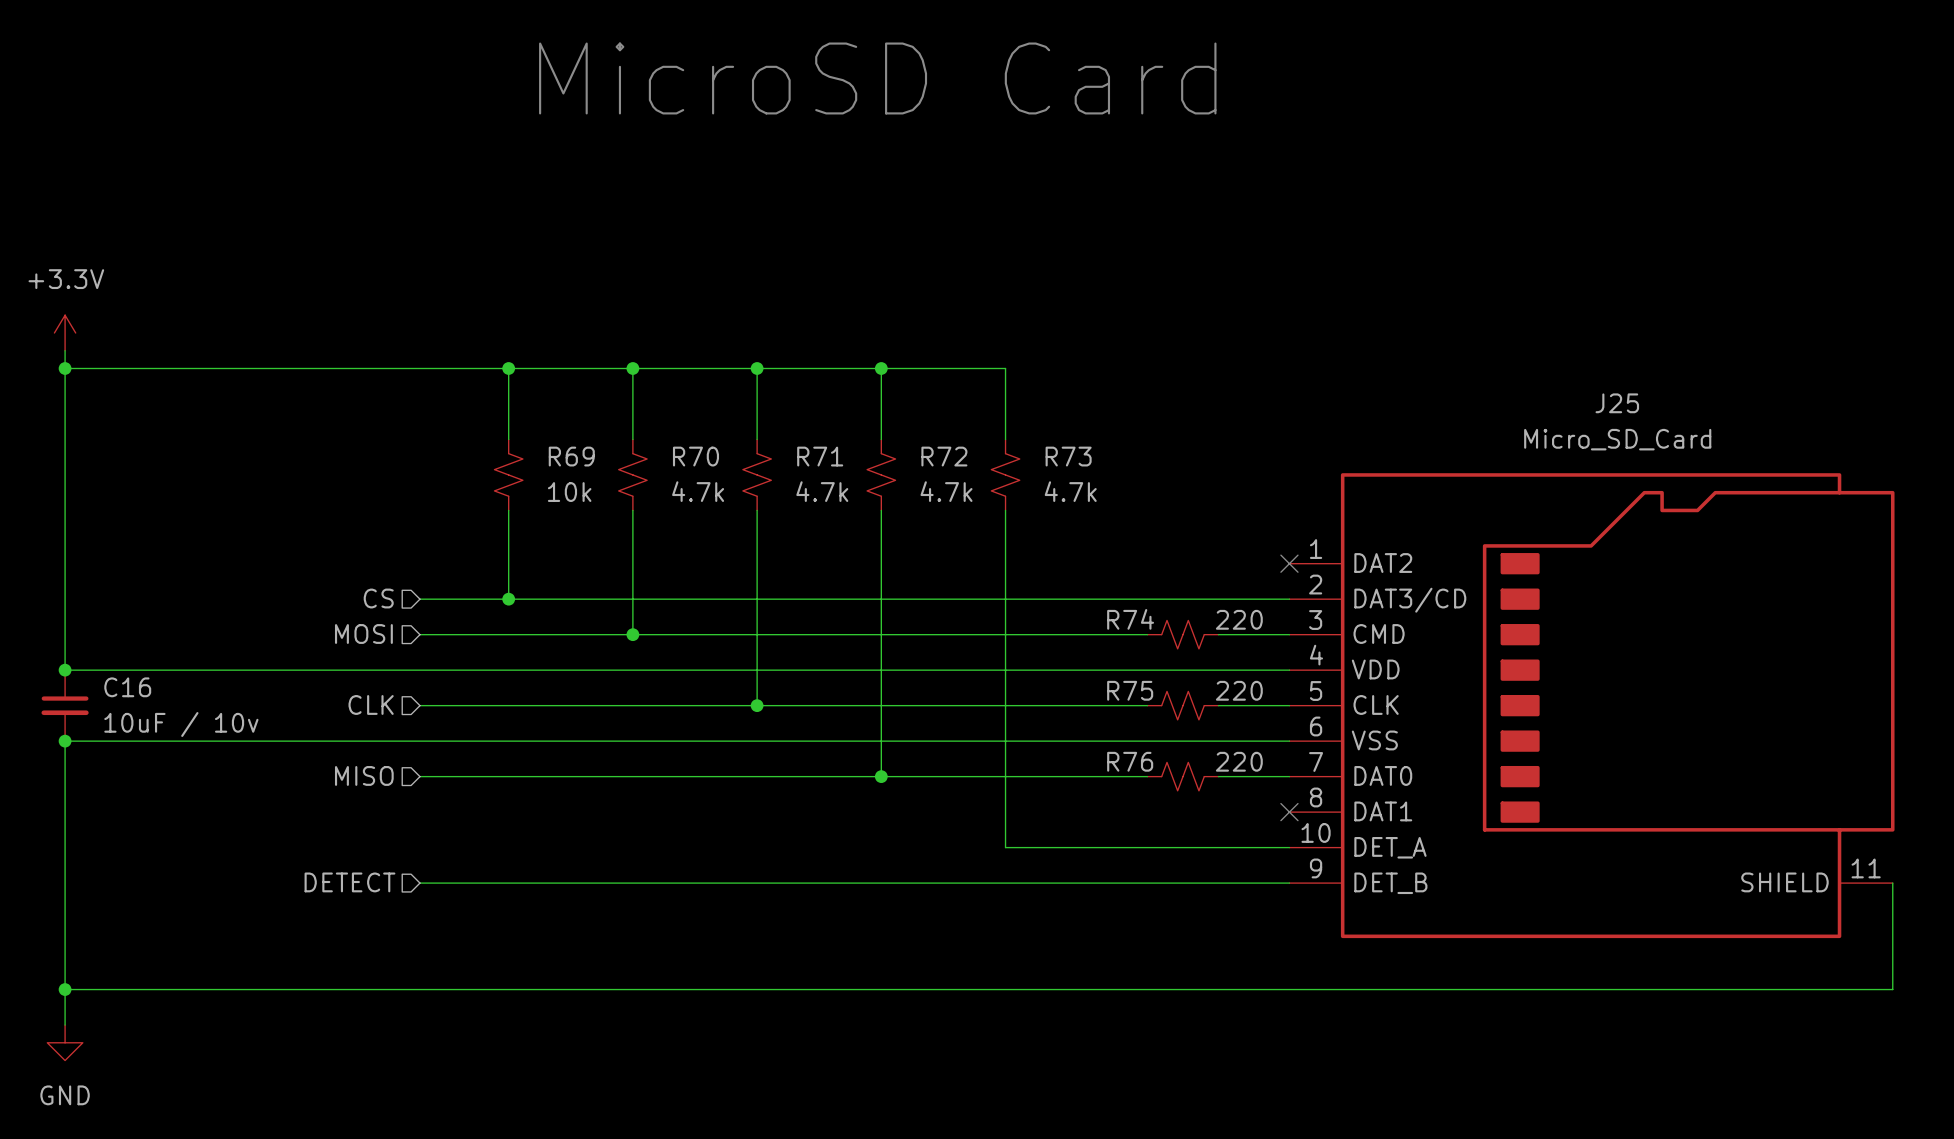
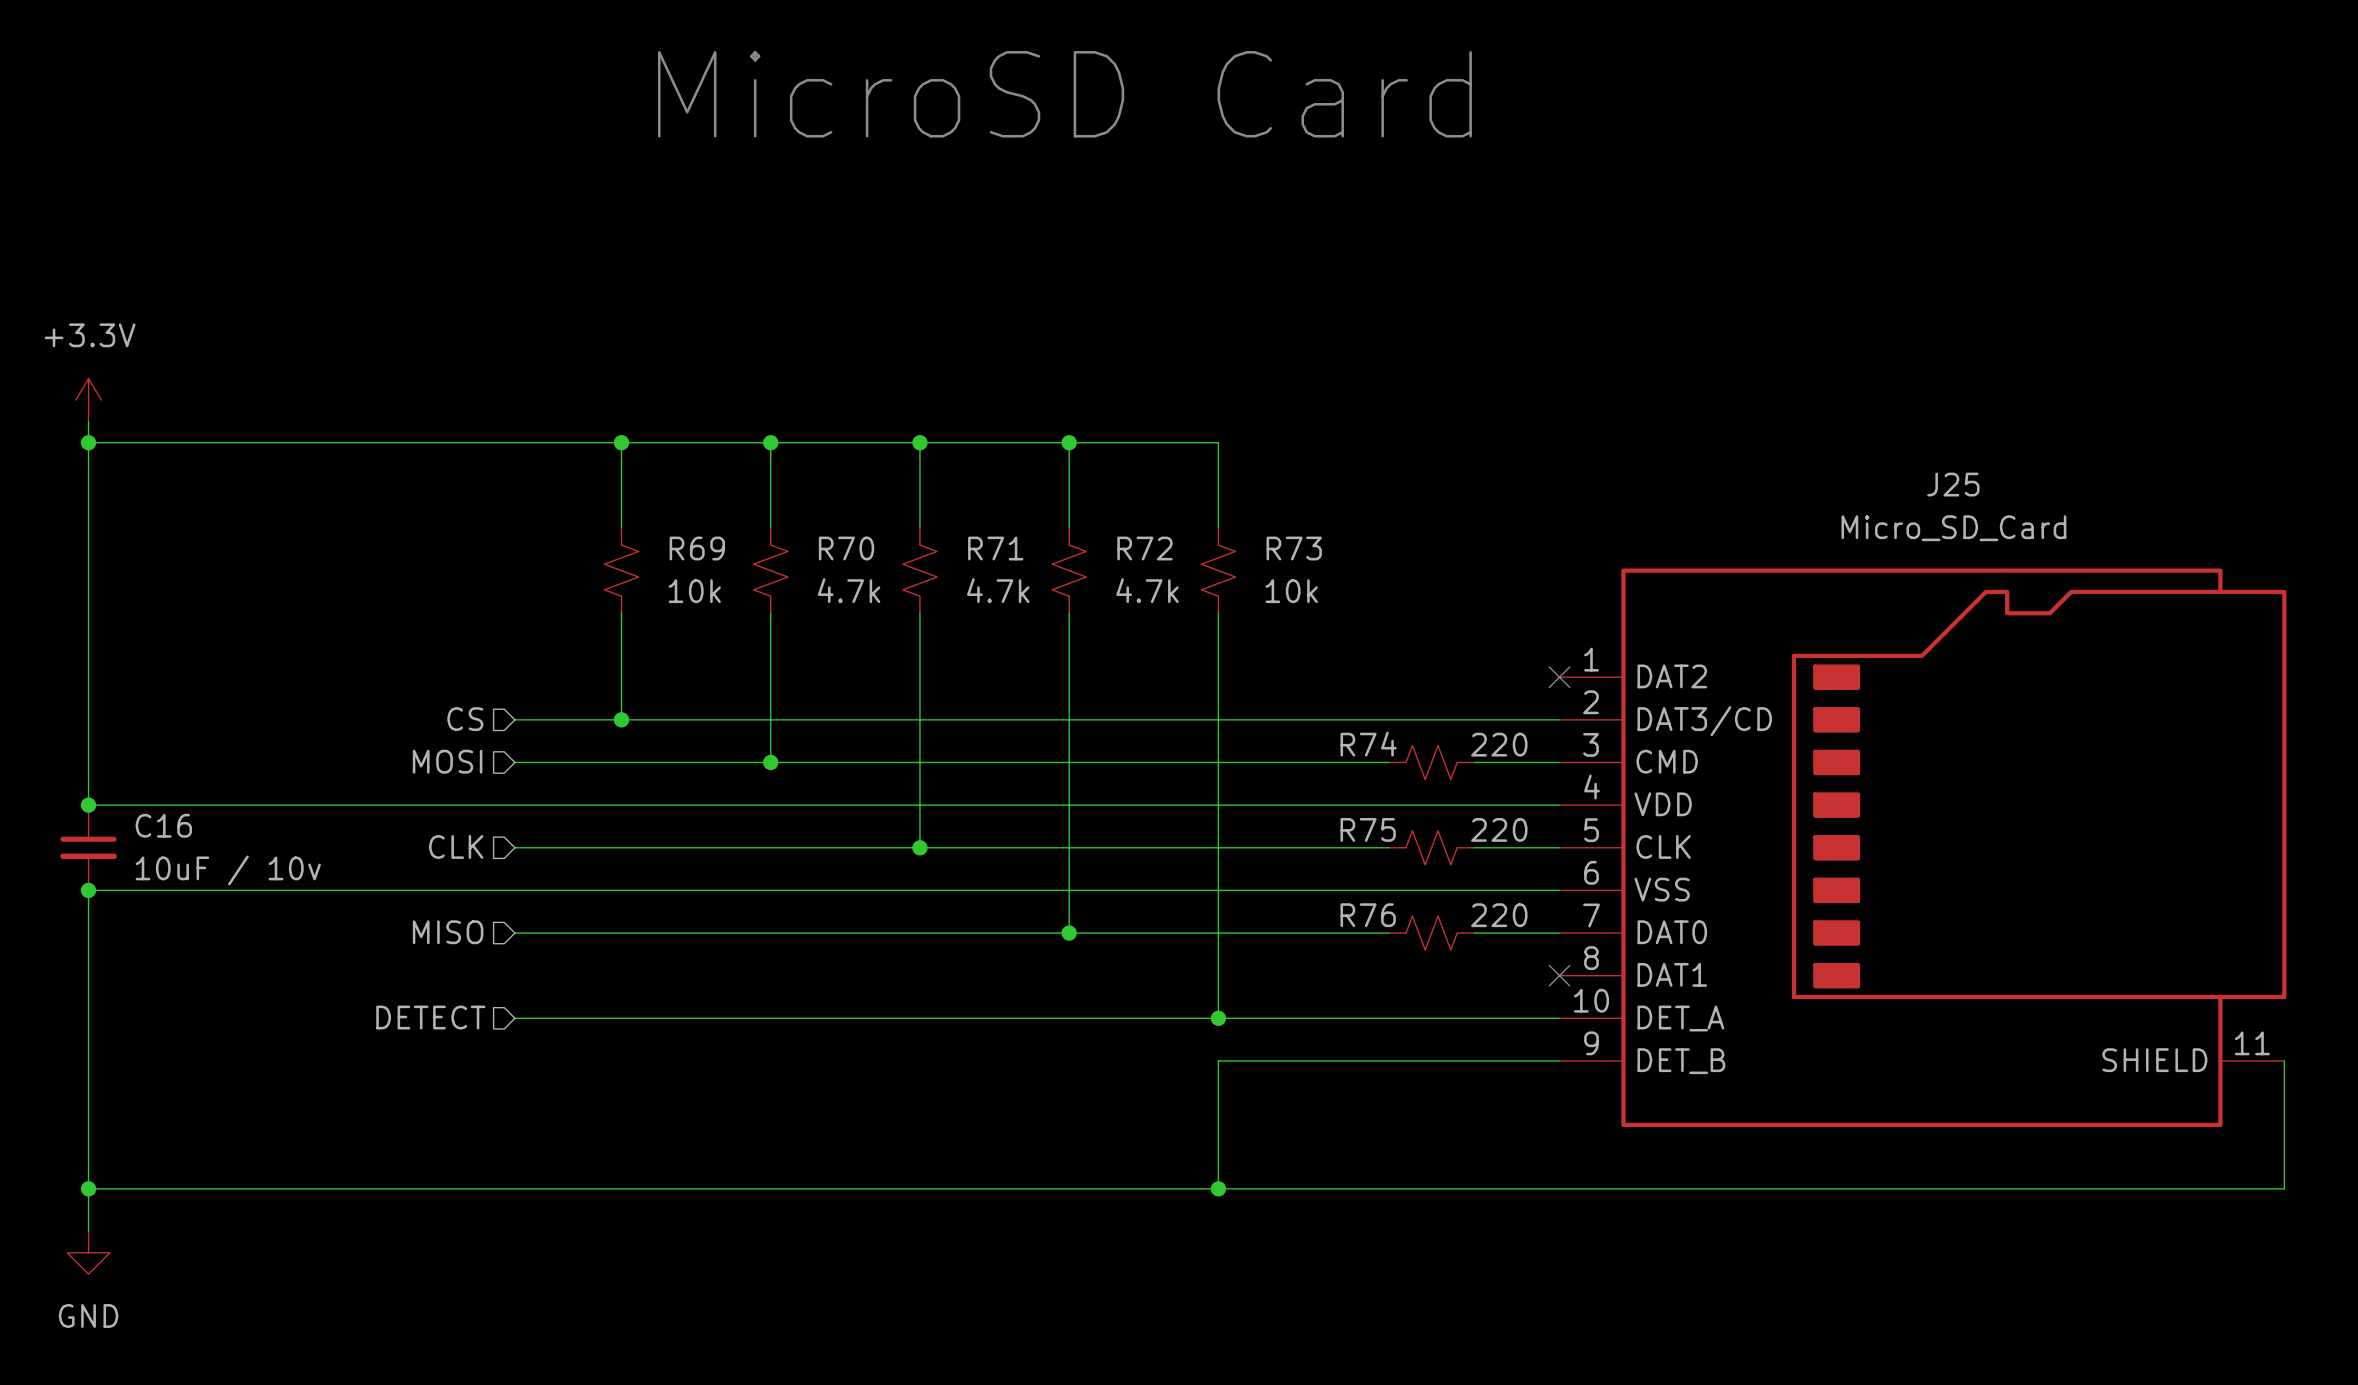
R73 value: 4.7k (1070, 491) -> 10k (1291, 591)
wire: none -> (514, 1018) (1218, 1018)
junction: none -> (1218, 1018)
hierarchical label position: DETECT (349, 882) -> DETECT (430, 1017)
wire: (419, 883) (1005, 883) -> (1218, 1188) (1218, 1060)
junction: none -> (1218, 1188)

